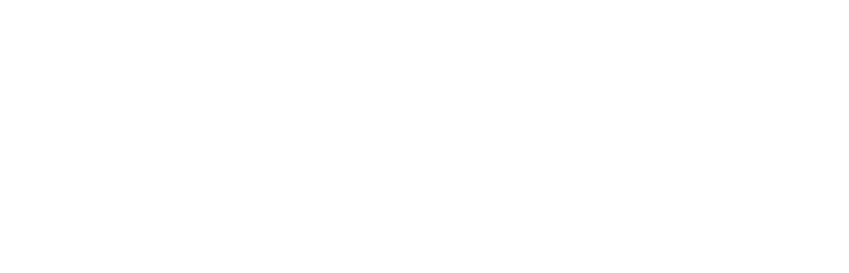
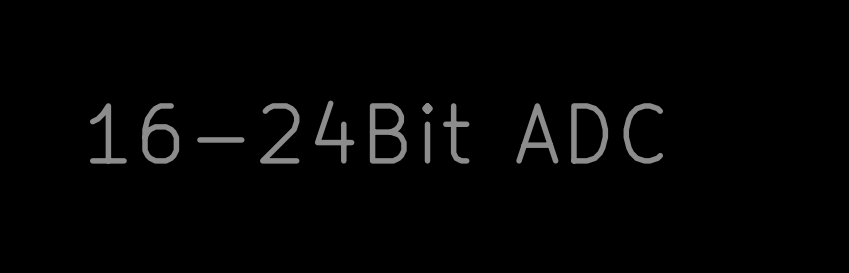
text: none -> 16-24Bit ADC (376, 132)

